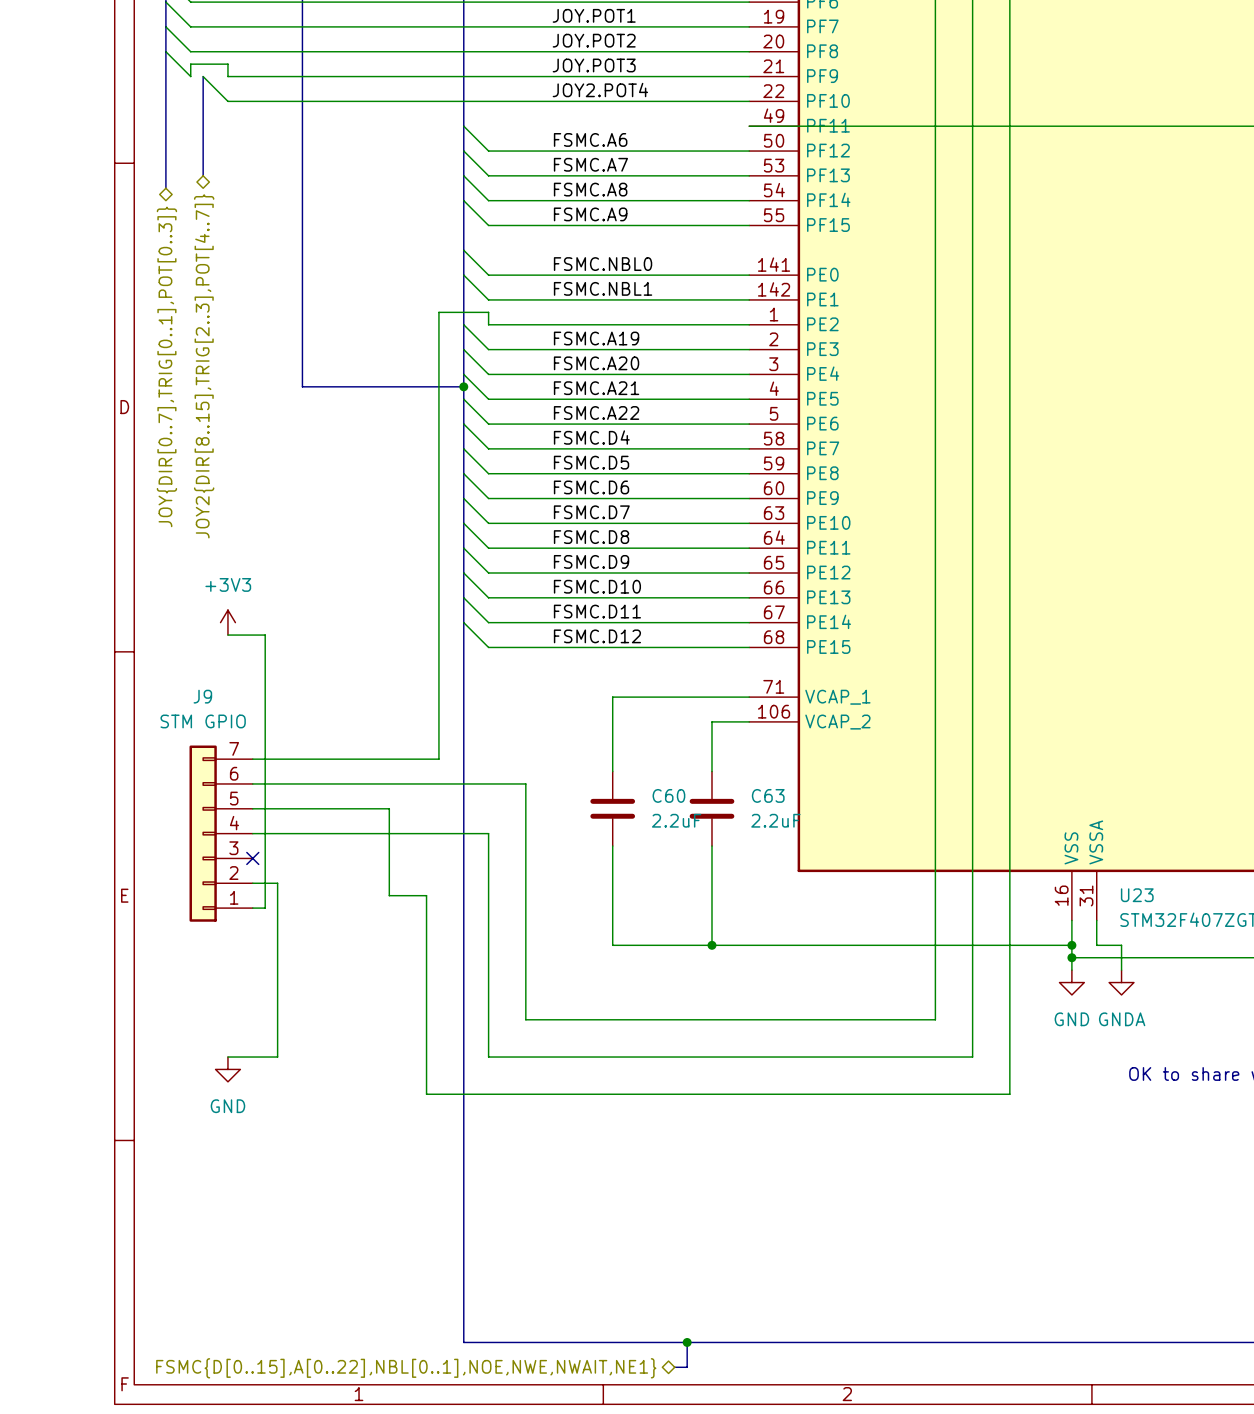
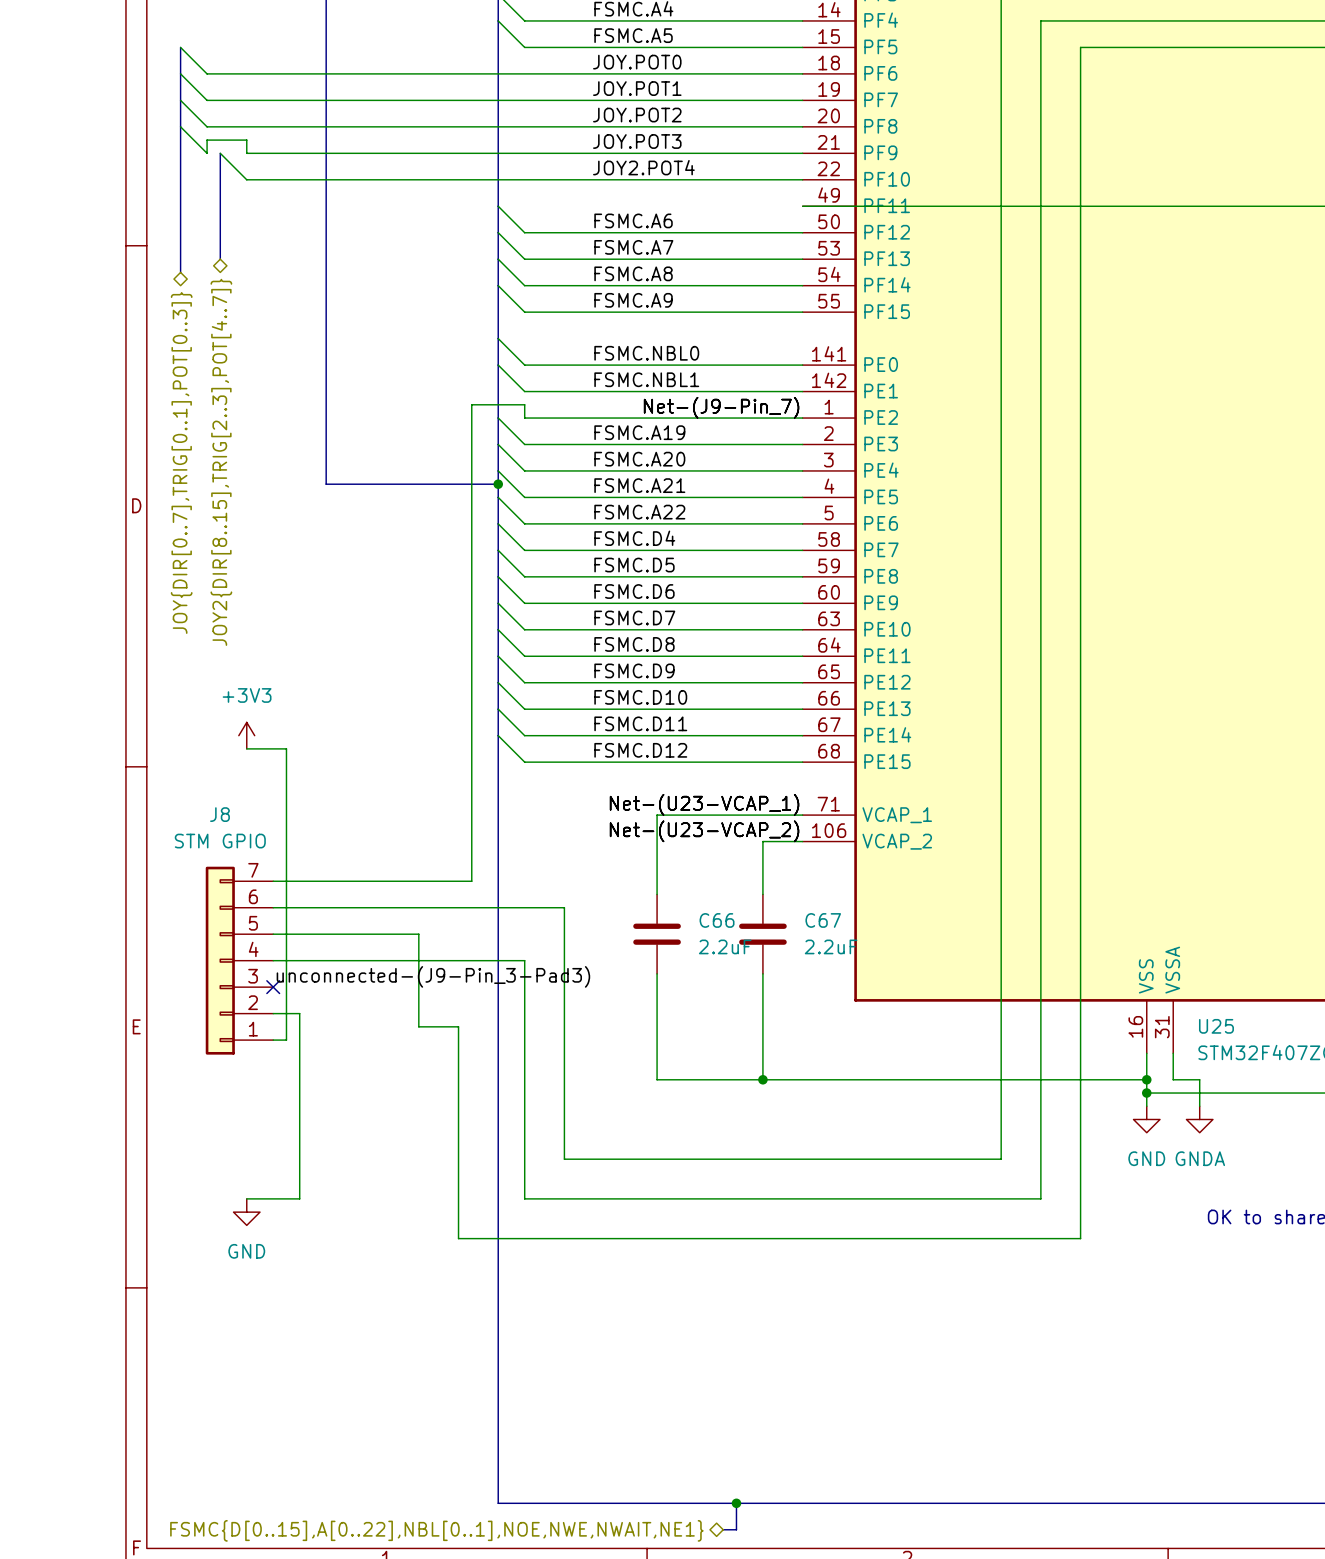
label: none -> Net-(J9-Pin_7) (721, 407)
label: none -> Net-(U23-VCAP_1) (704, 804)
J9 name: J9 (202, 696) -> J8 (219, 814)
label: none -> Net-(U23-VCAP_2) (704, 831)
C60 name: C60 (668, 795) -> C66 (717, 920)
C63 name: C63 (768, 795) -> C67 (823, 920)
label: none -> unconnected-(J9-Pin_3-Pad3) (433, 976)
U23 name: U23 (1137, 895) -> U25 (1216, 1026)

